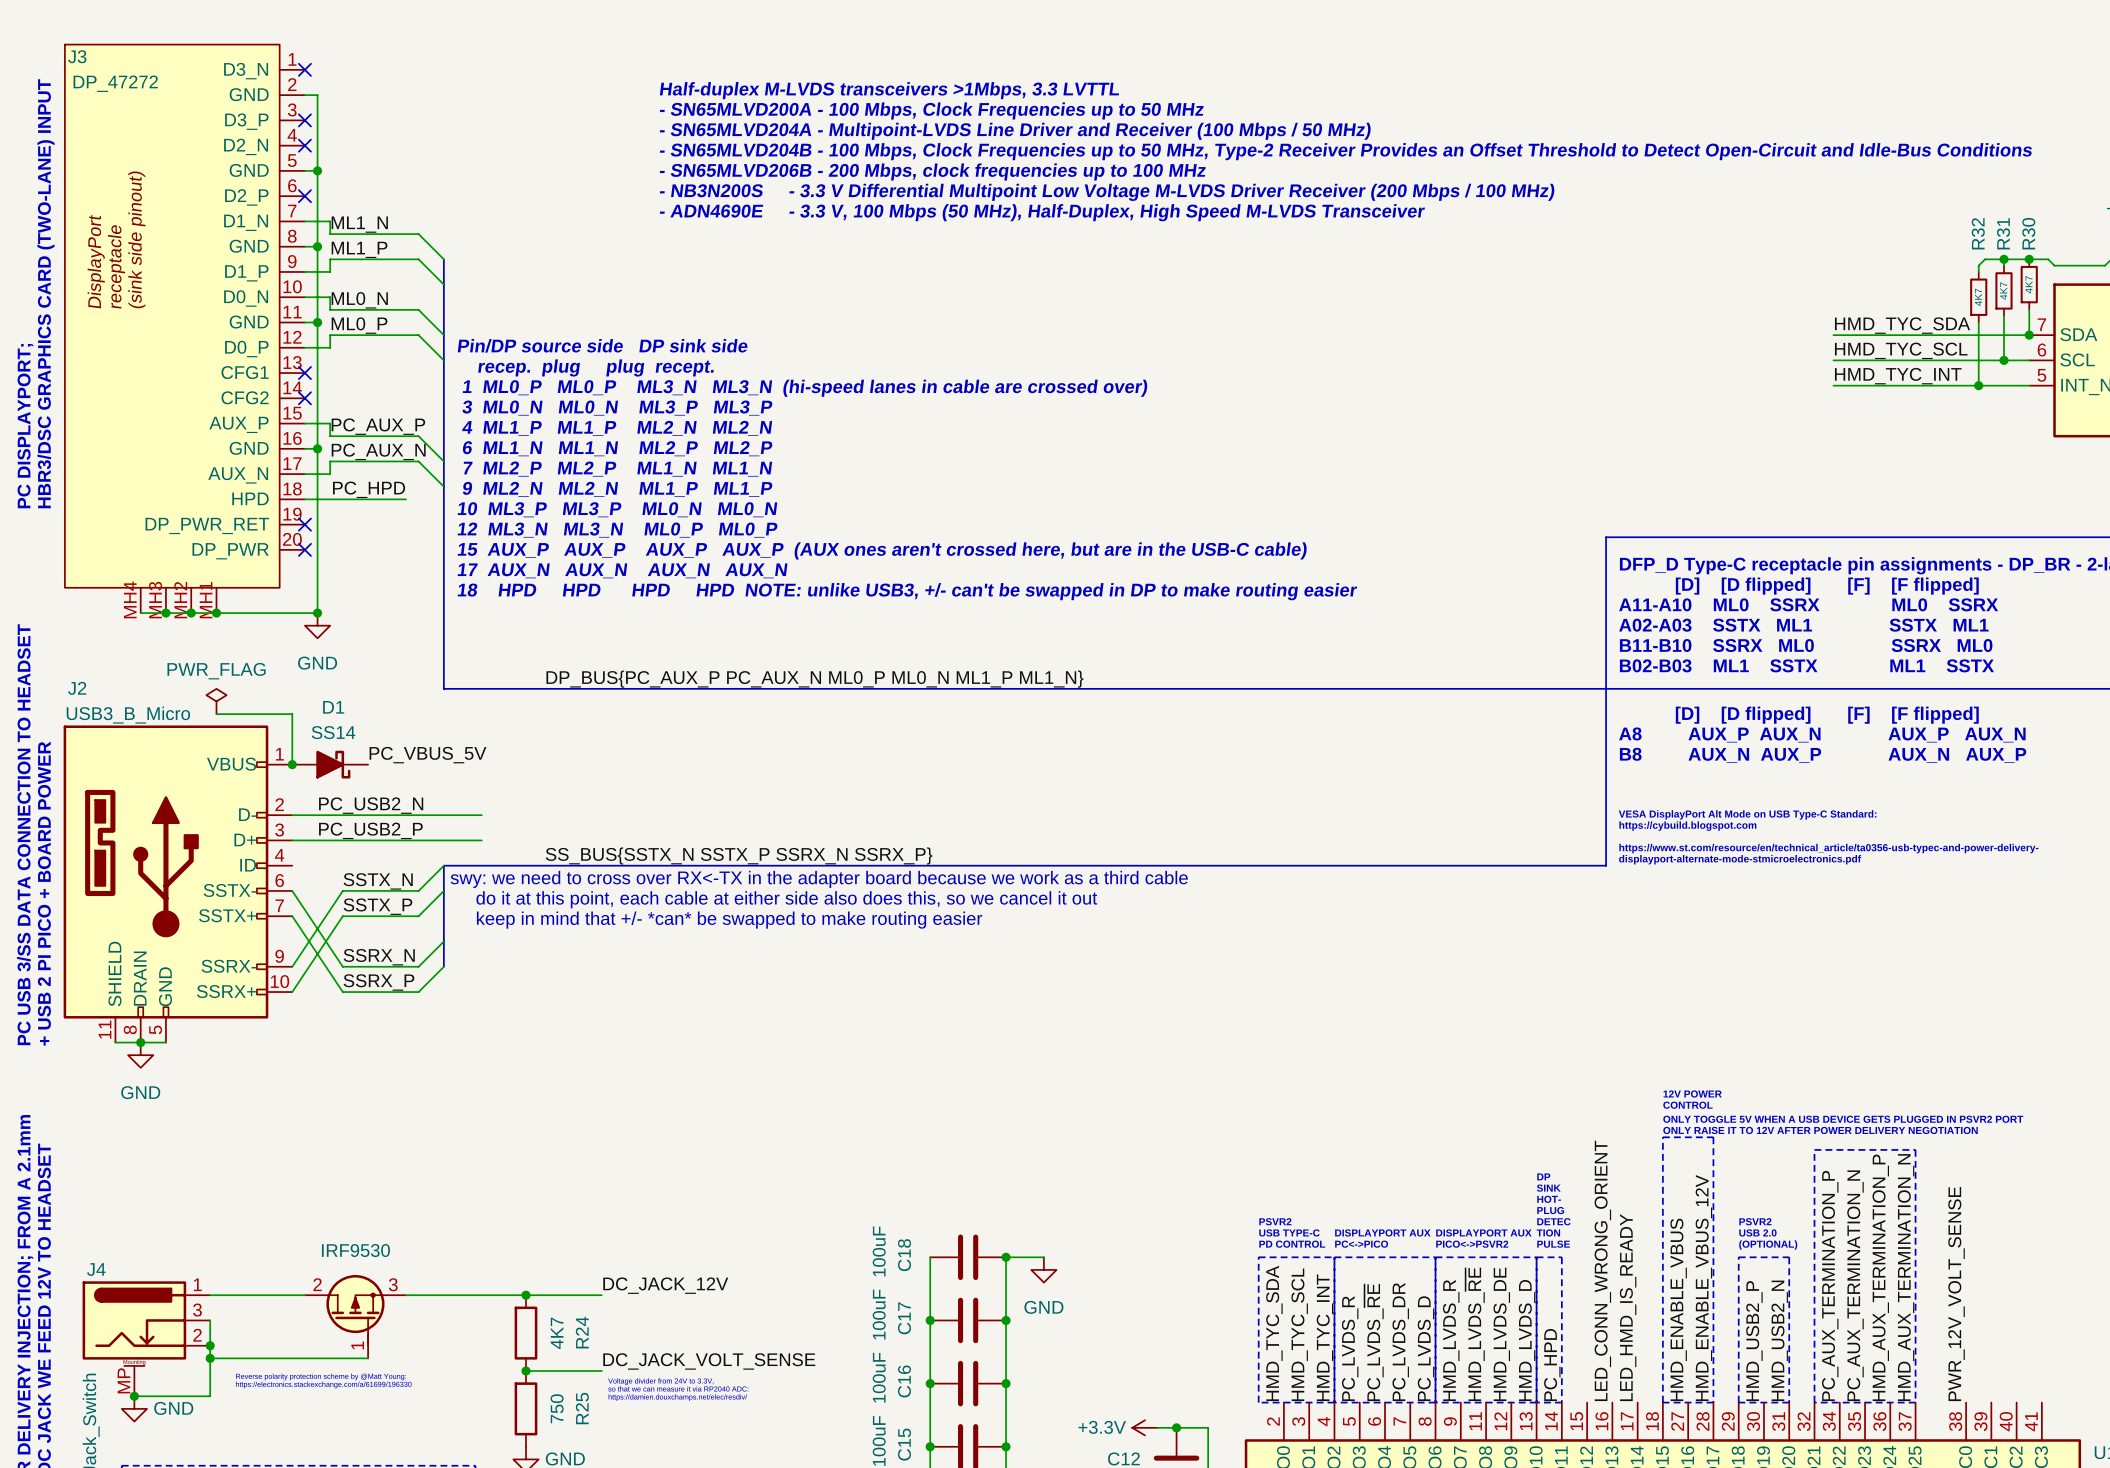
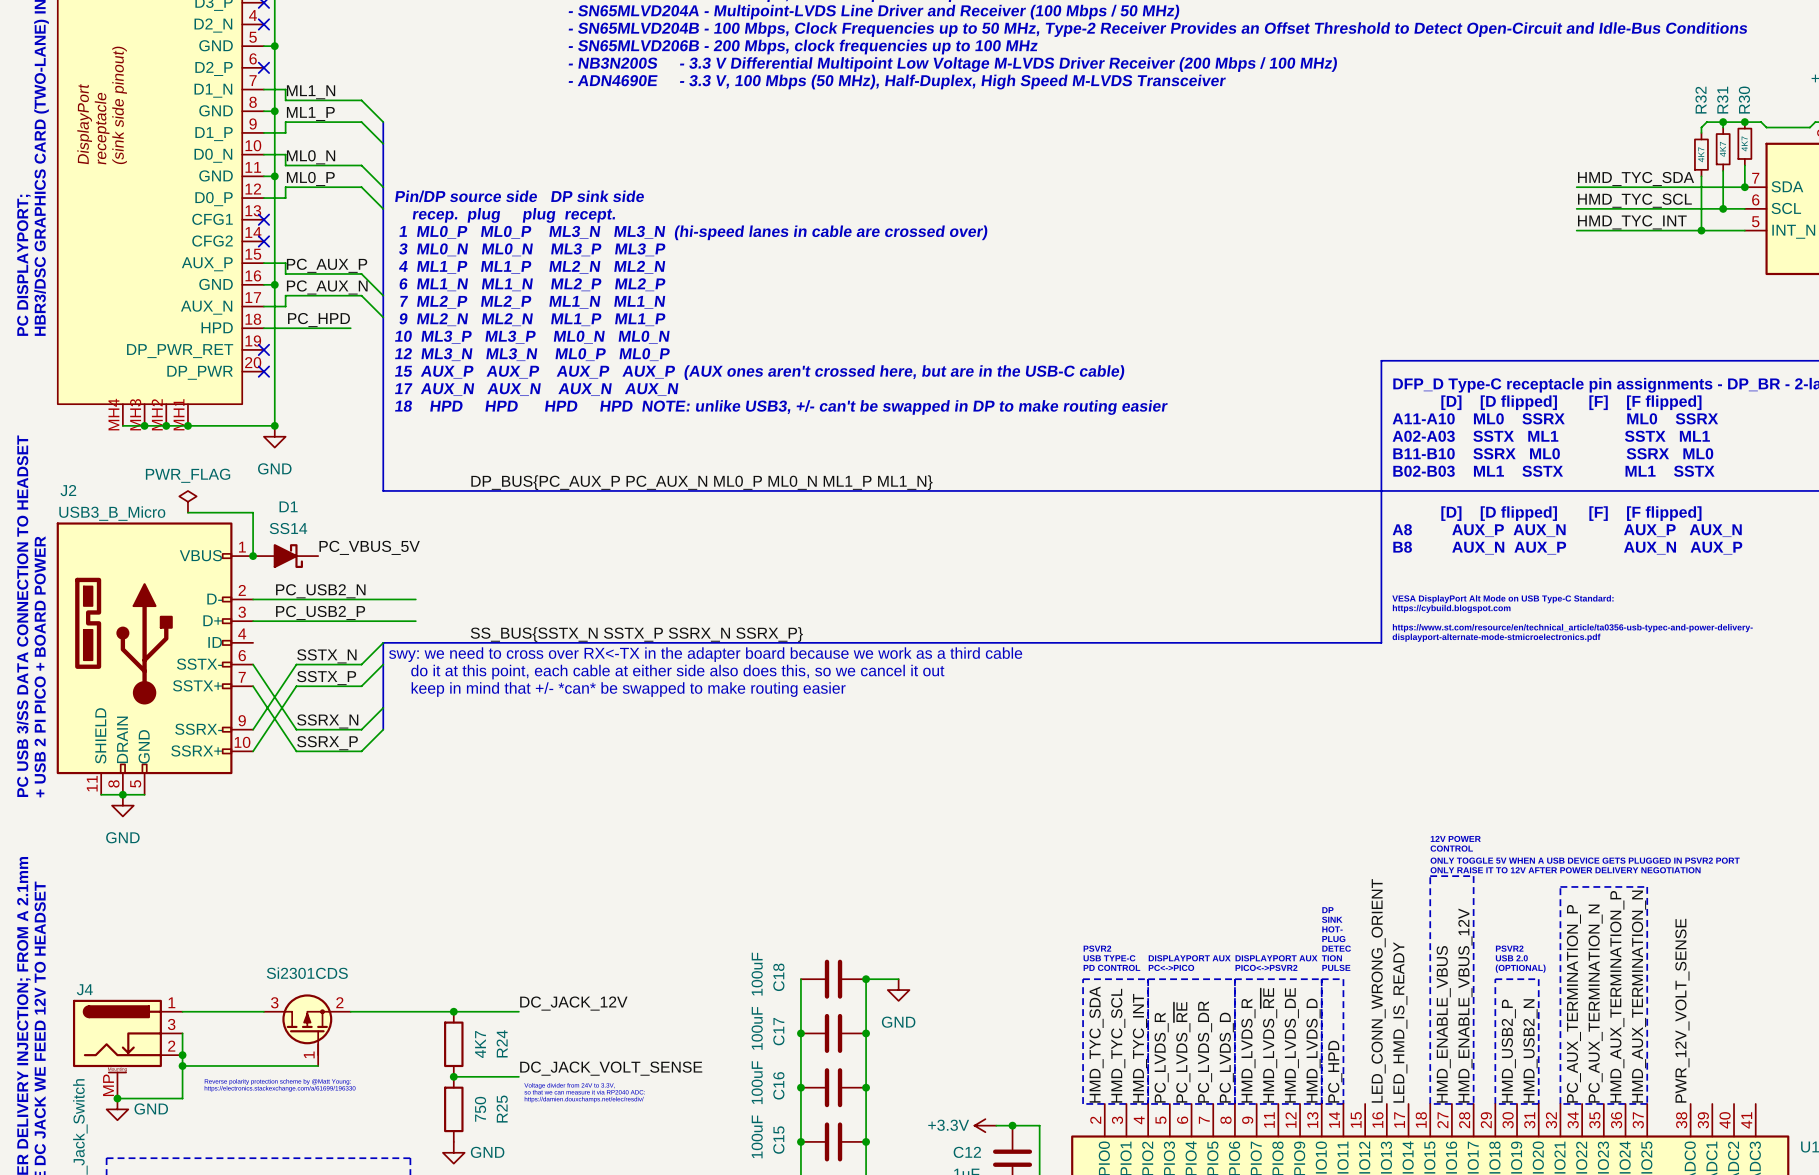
part value: IRF9530 (355, 1250) -> Si2301CDS (307, 973)
part pin number: 2 (317, 1284) -> 3 (274, 1002)
part pin number: 3 (393, 1284) -> 2 (339, 1002)

